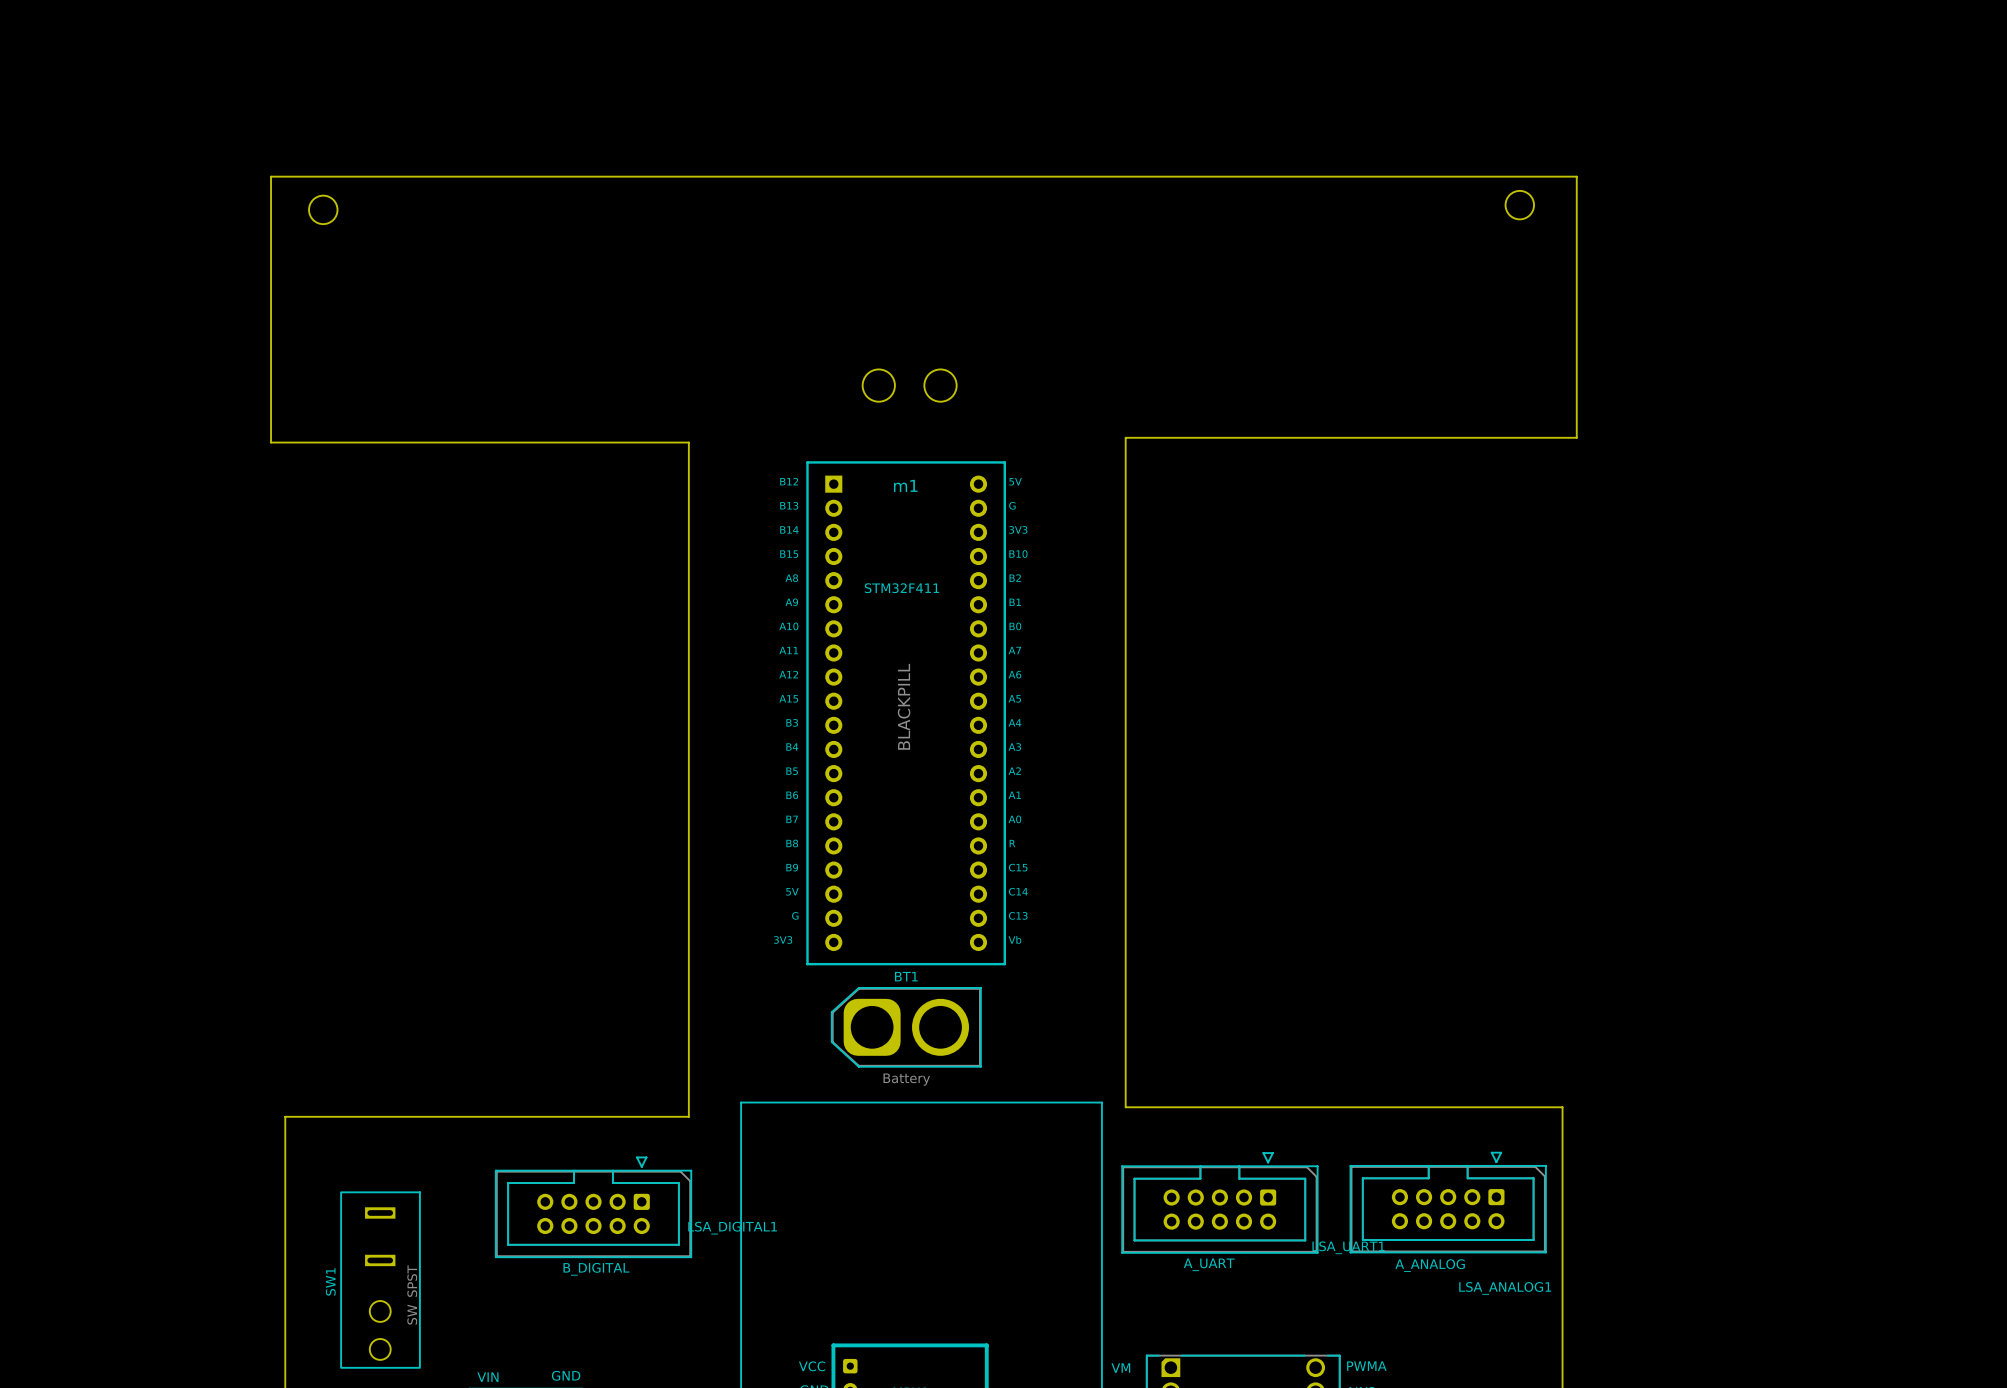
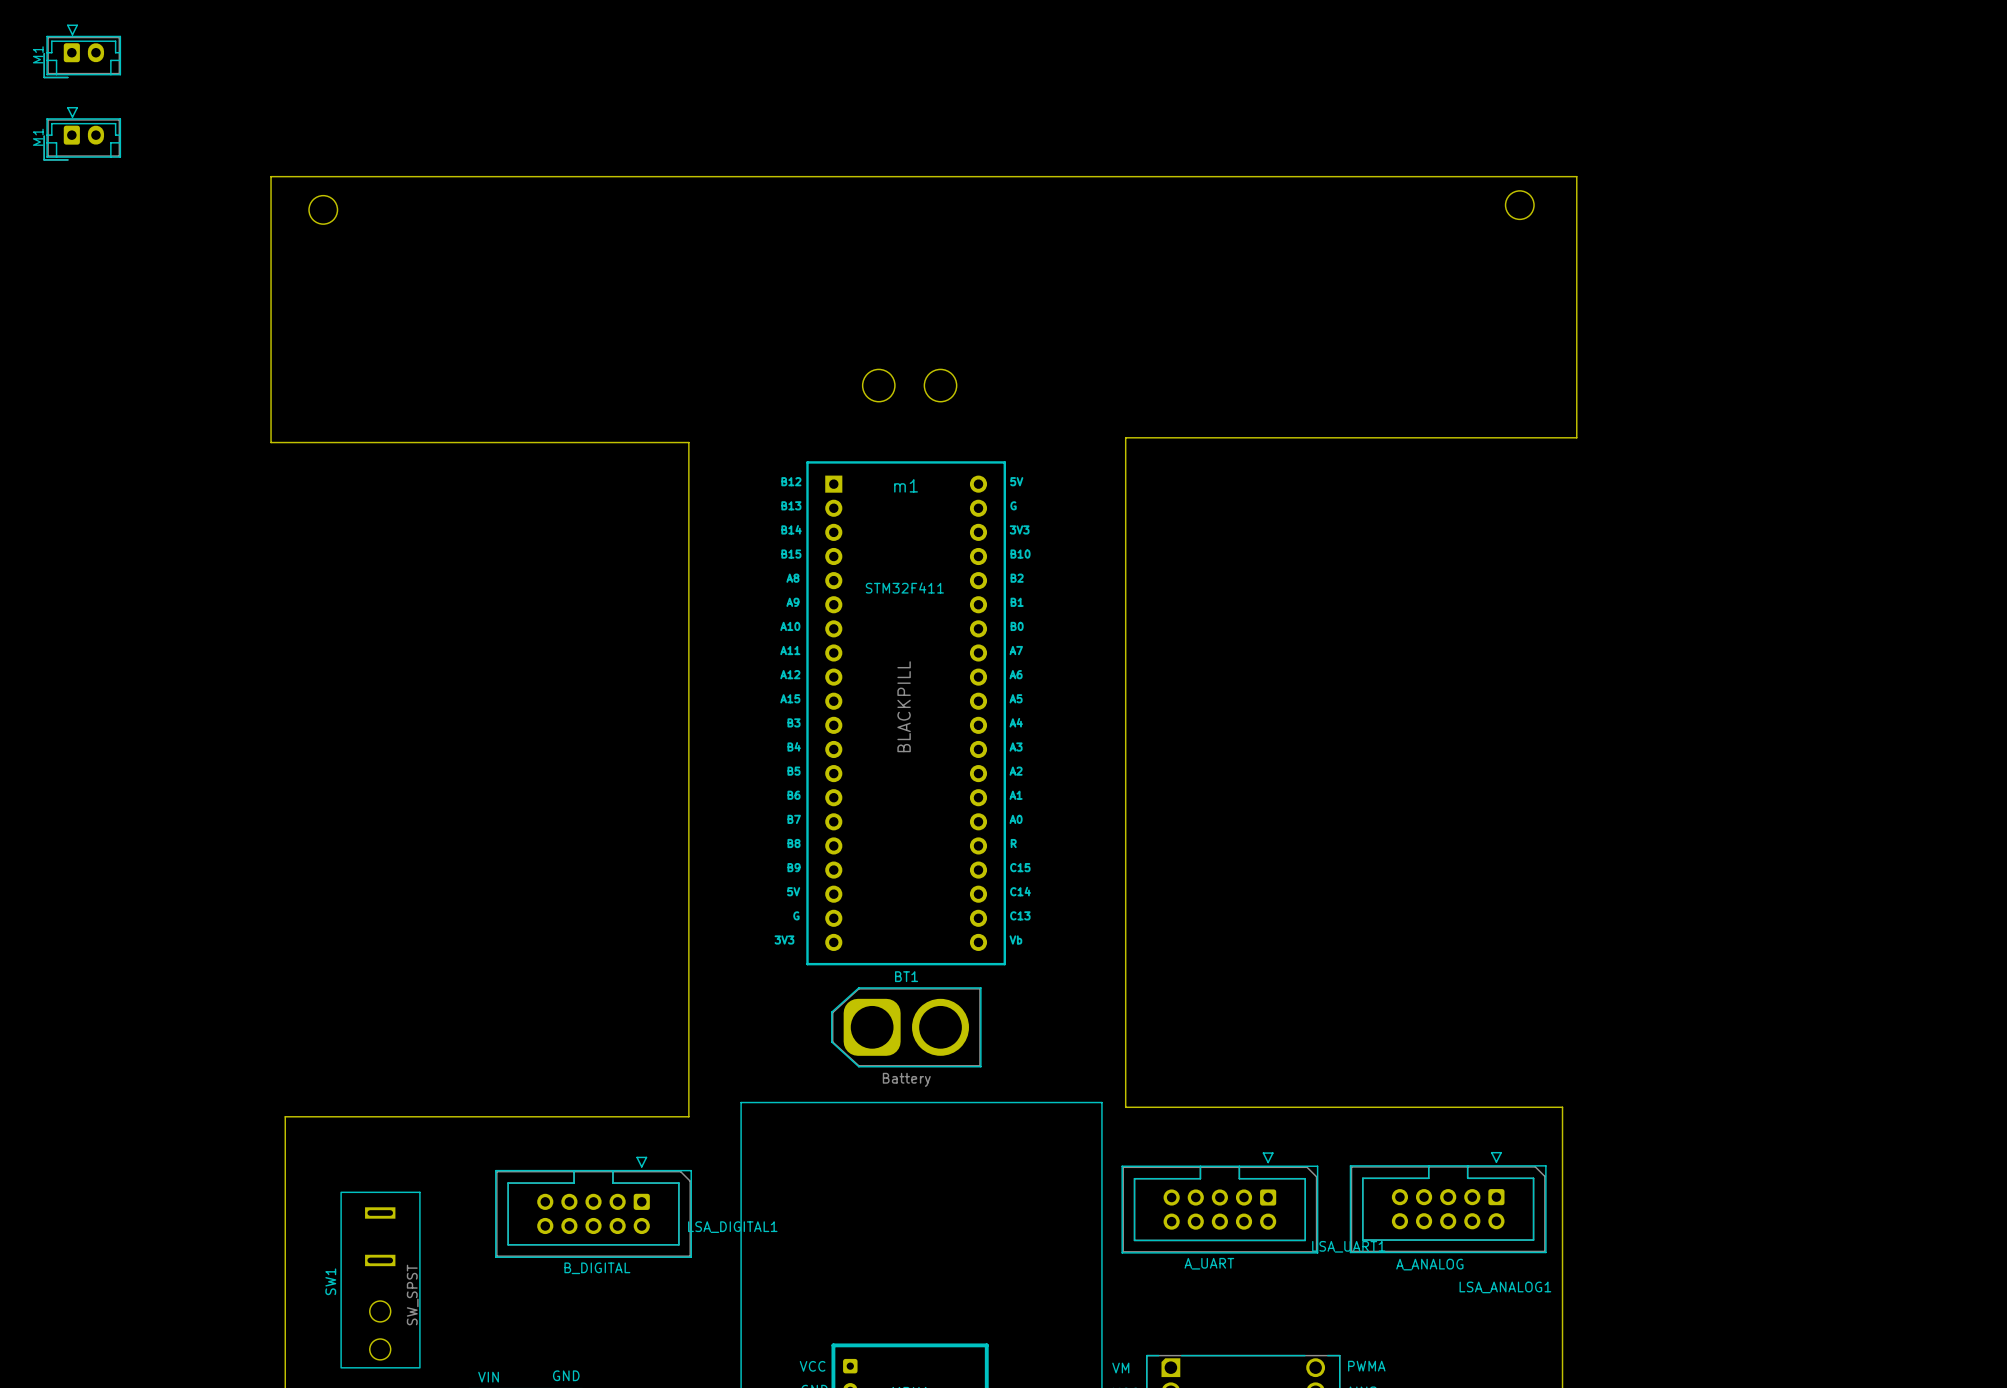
part: none -> (82, 51)
part: none -> (82, 133)

